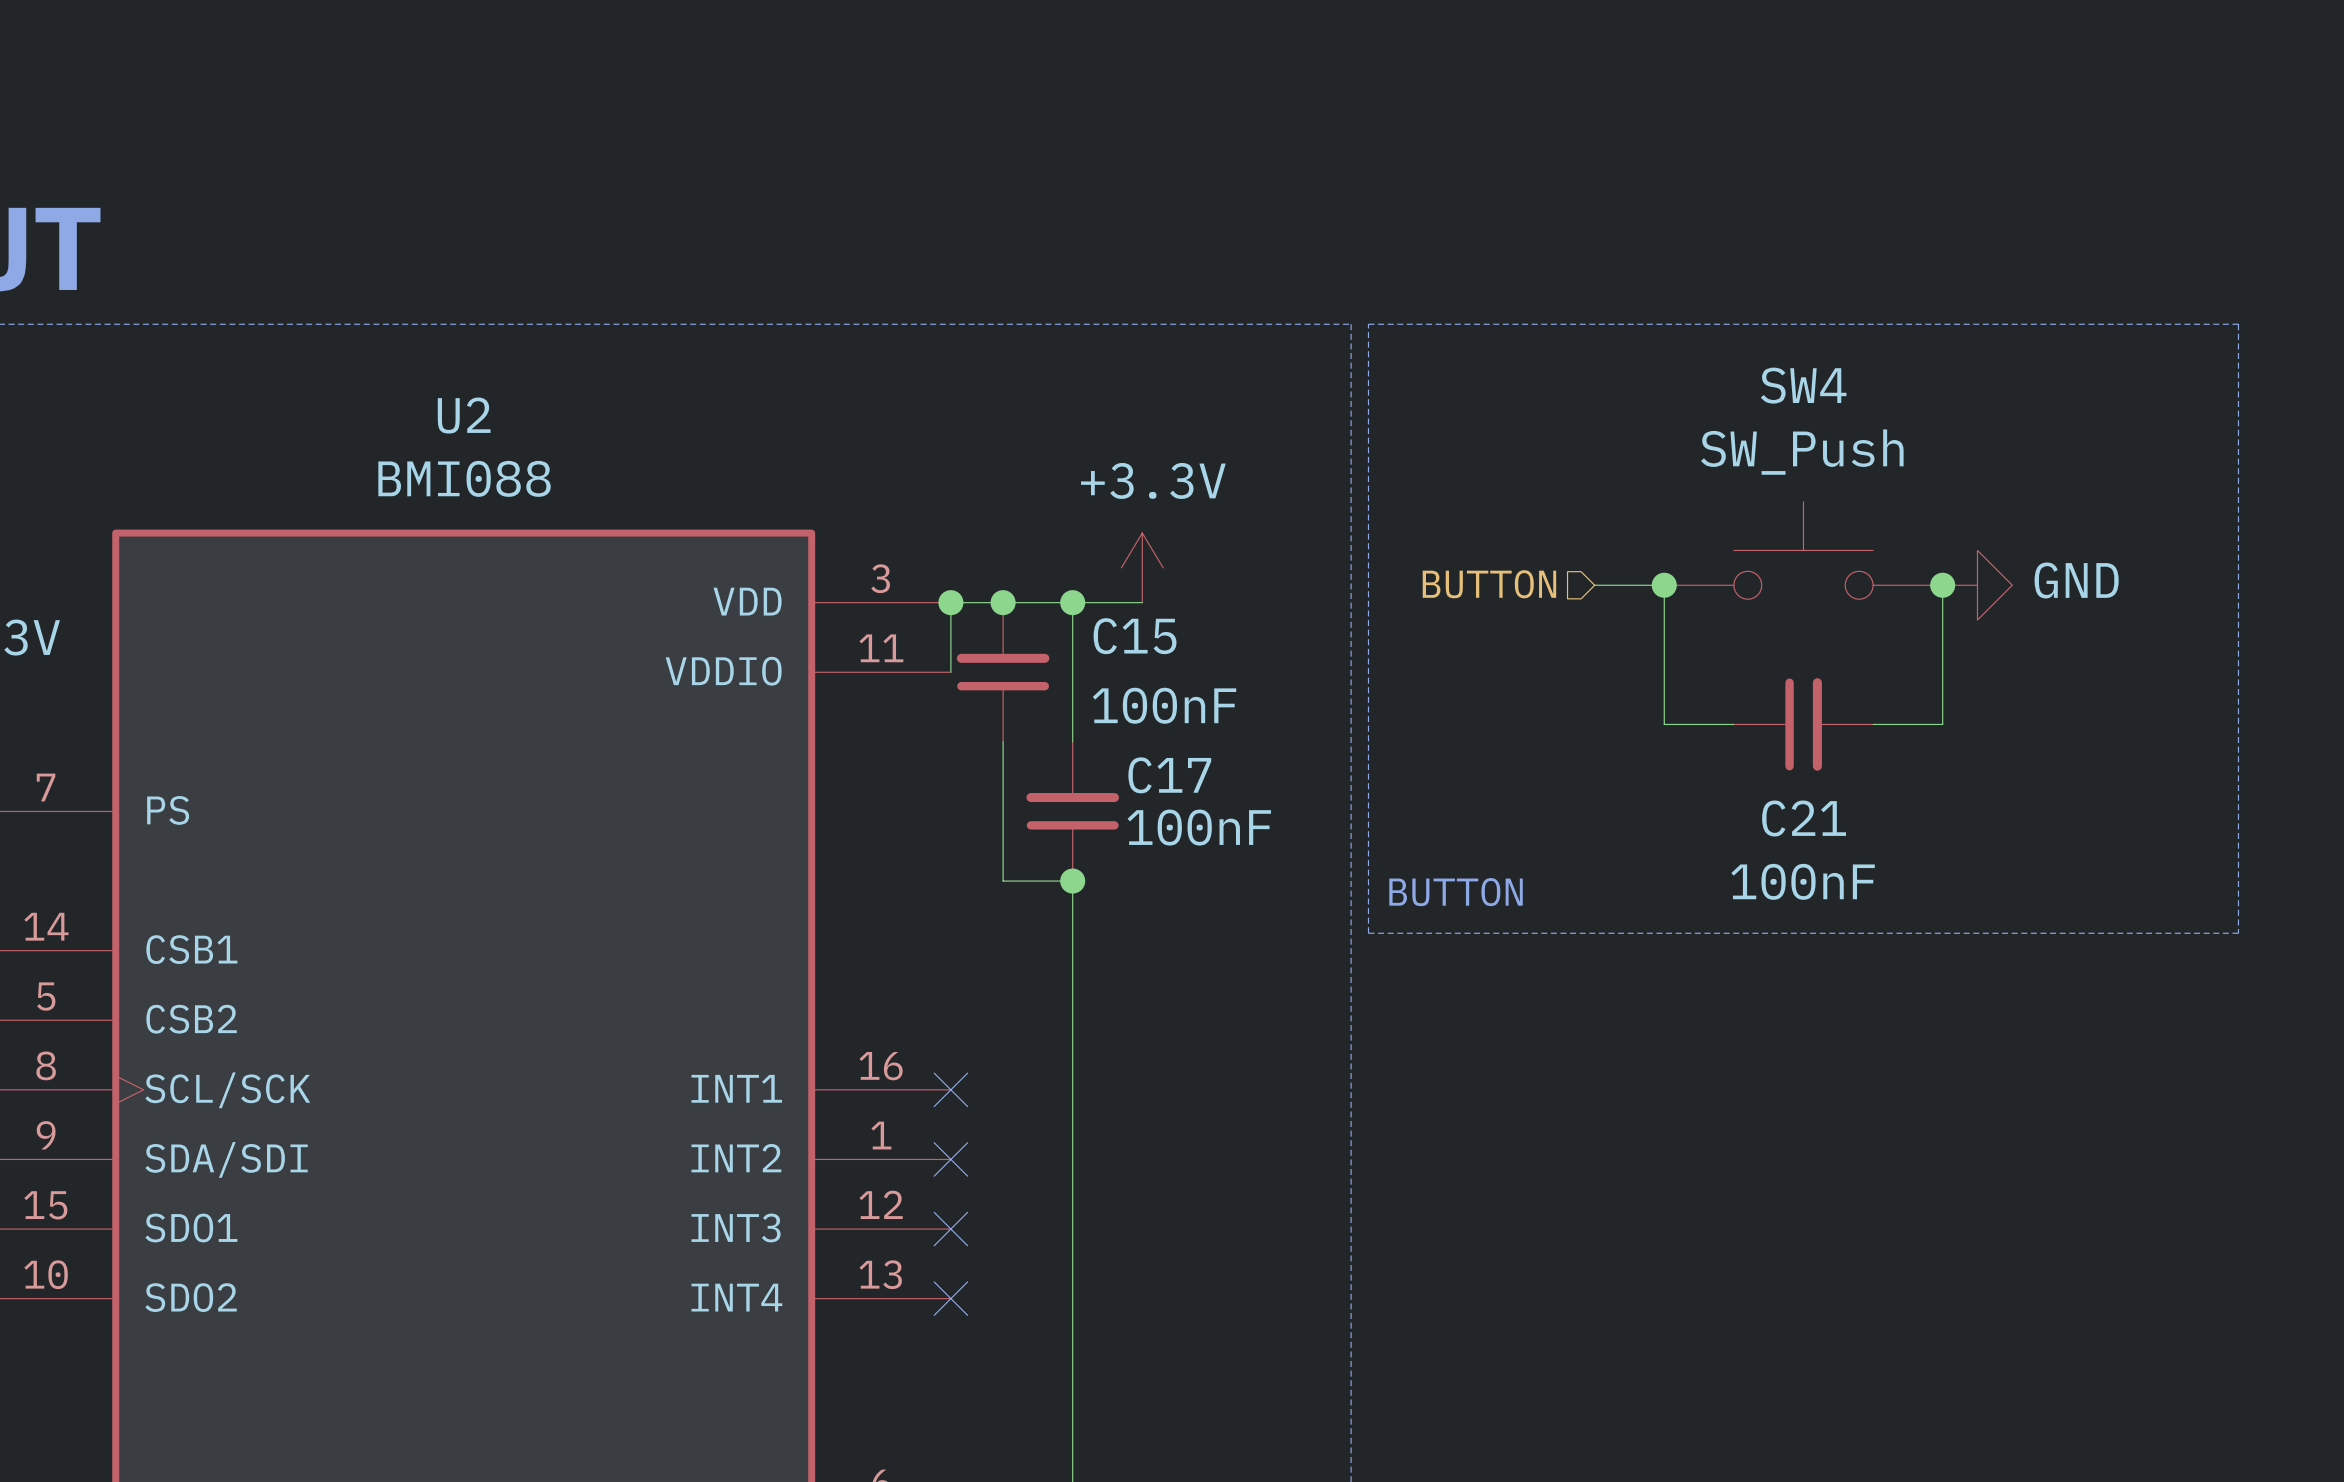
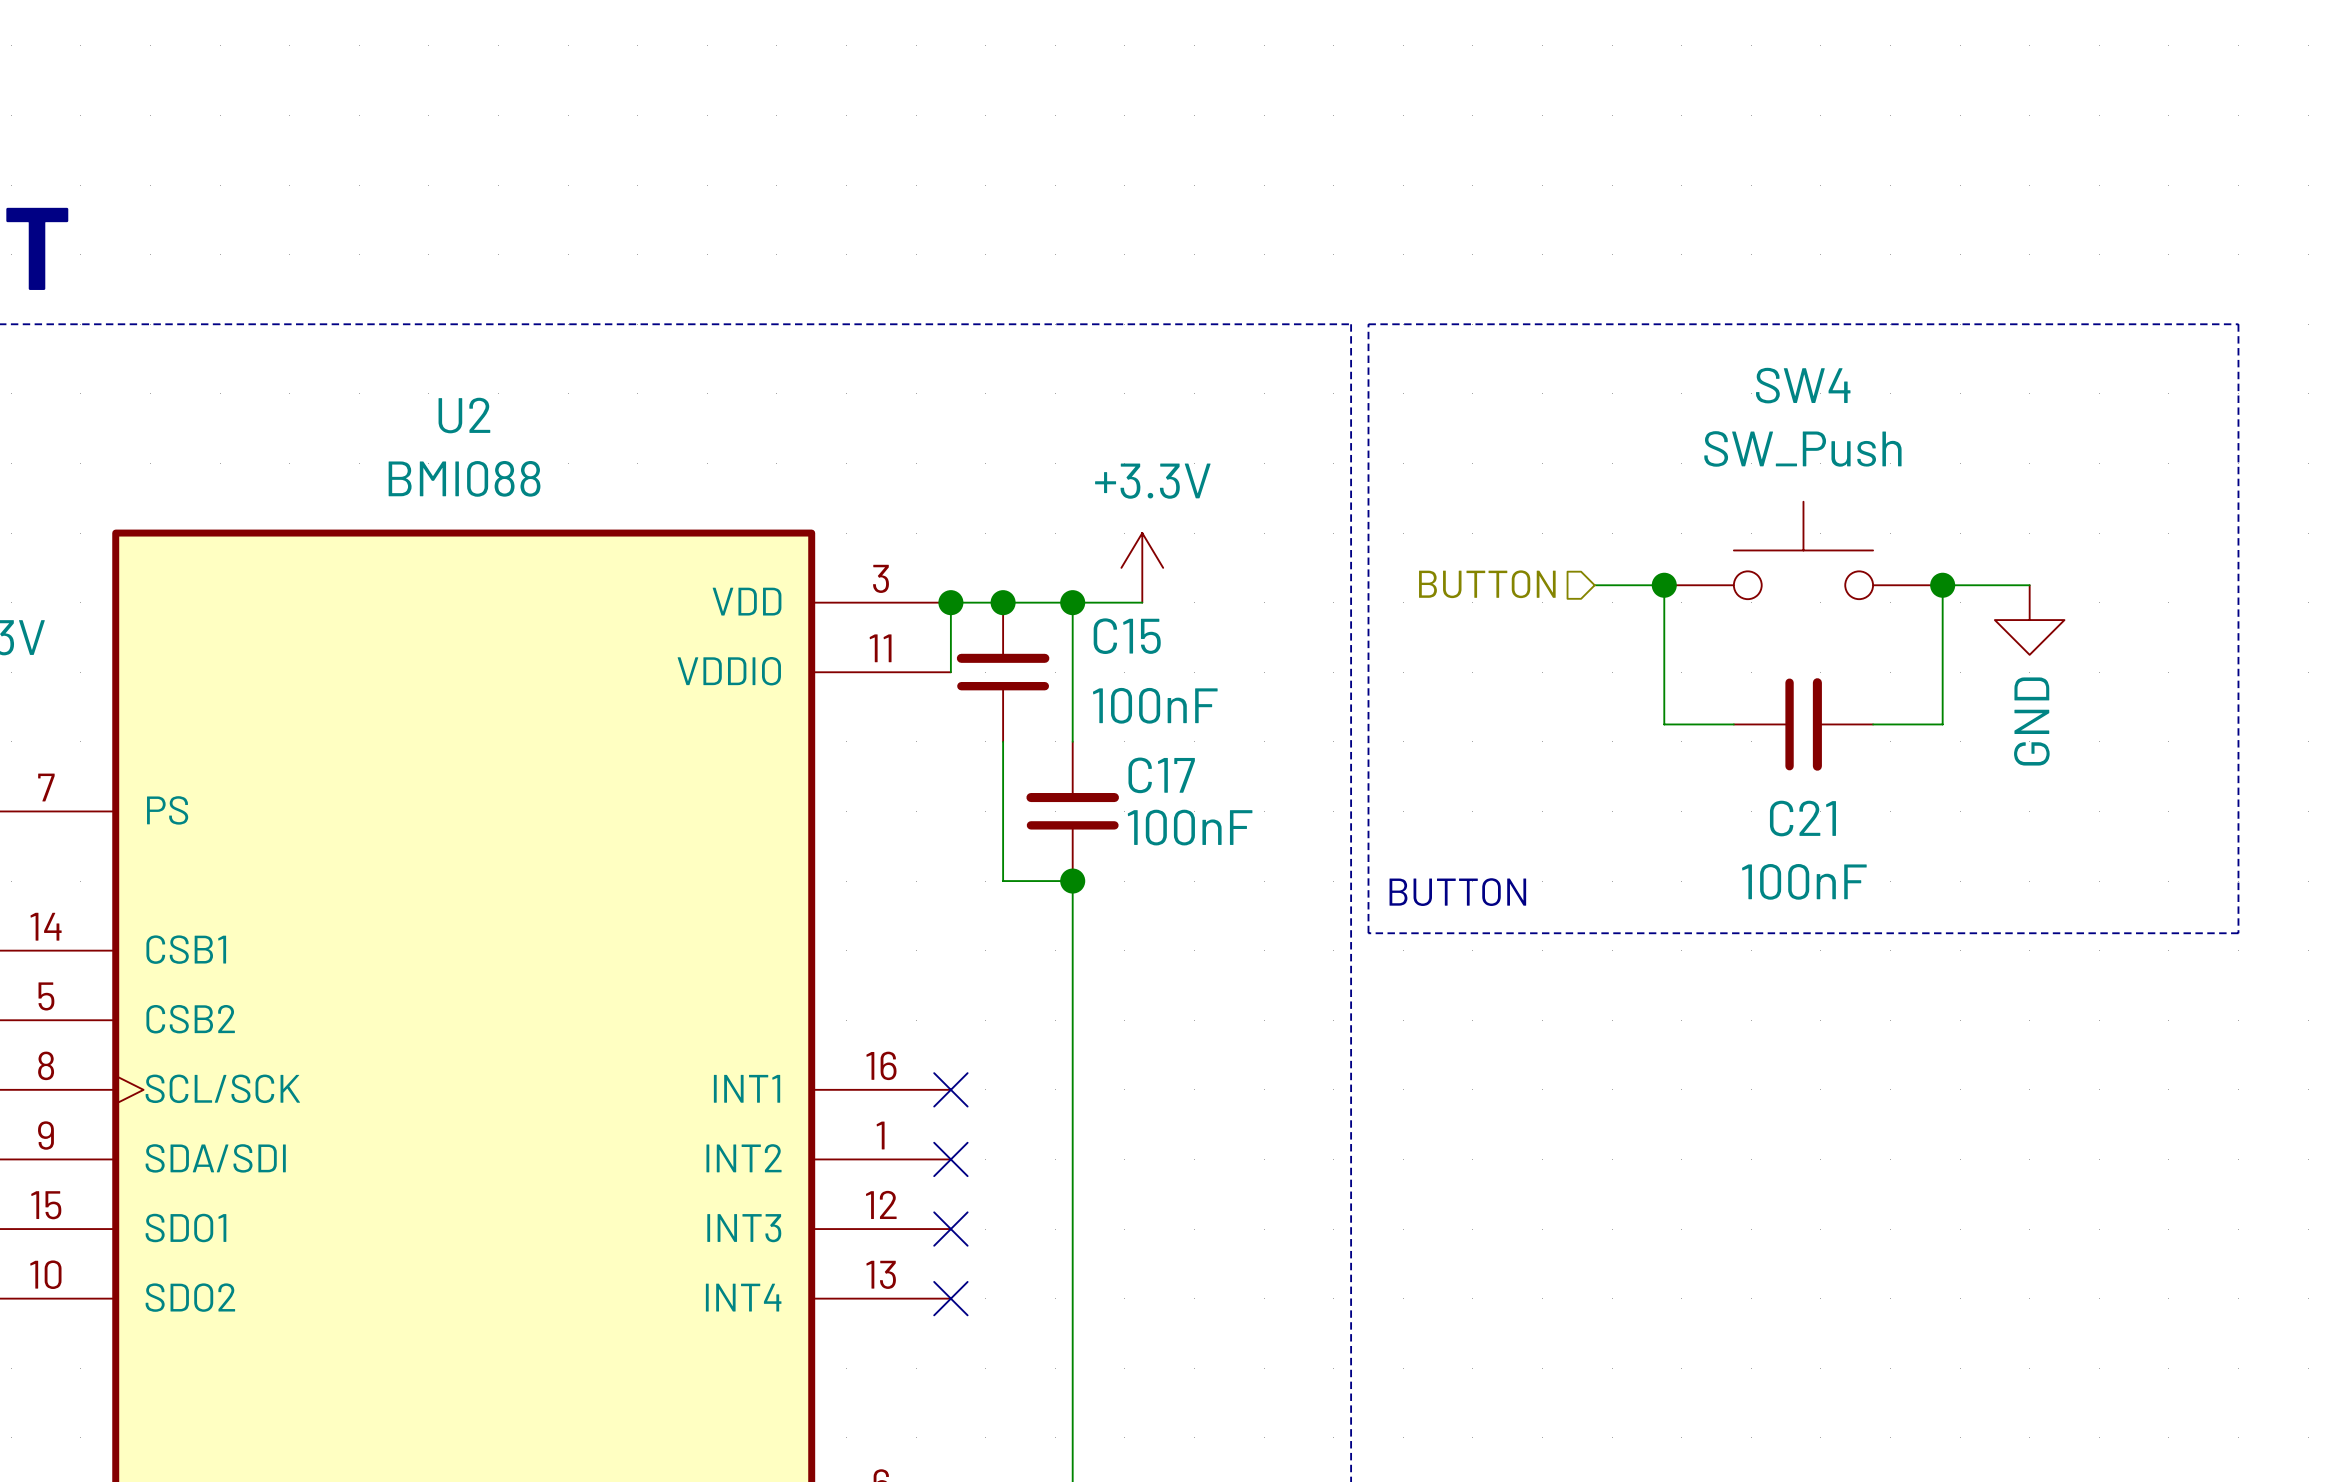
wire: none -> (1942, 585) (2029, 585)
power symbol rotation: 0° (1977, 585) -> 90° clockwise (2029, 620)
power symbol position: GND (1977, 585) -> GND (2029, 620)

